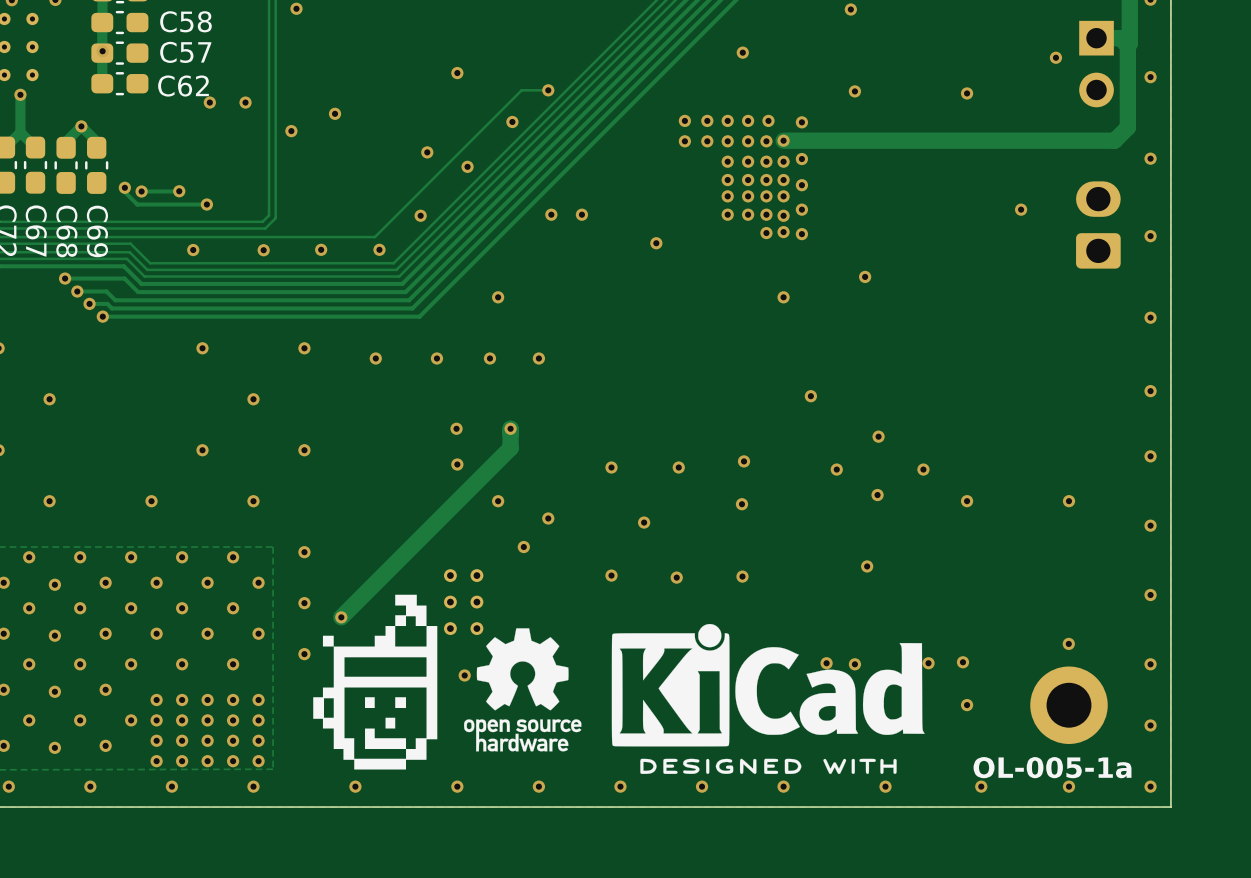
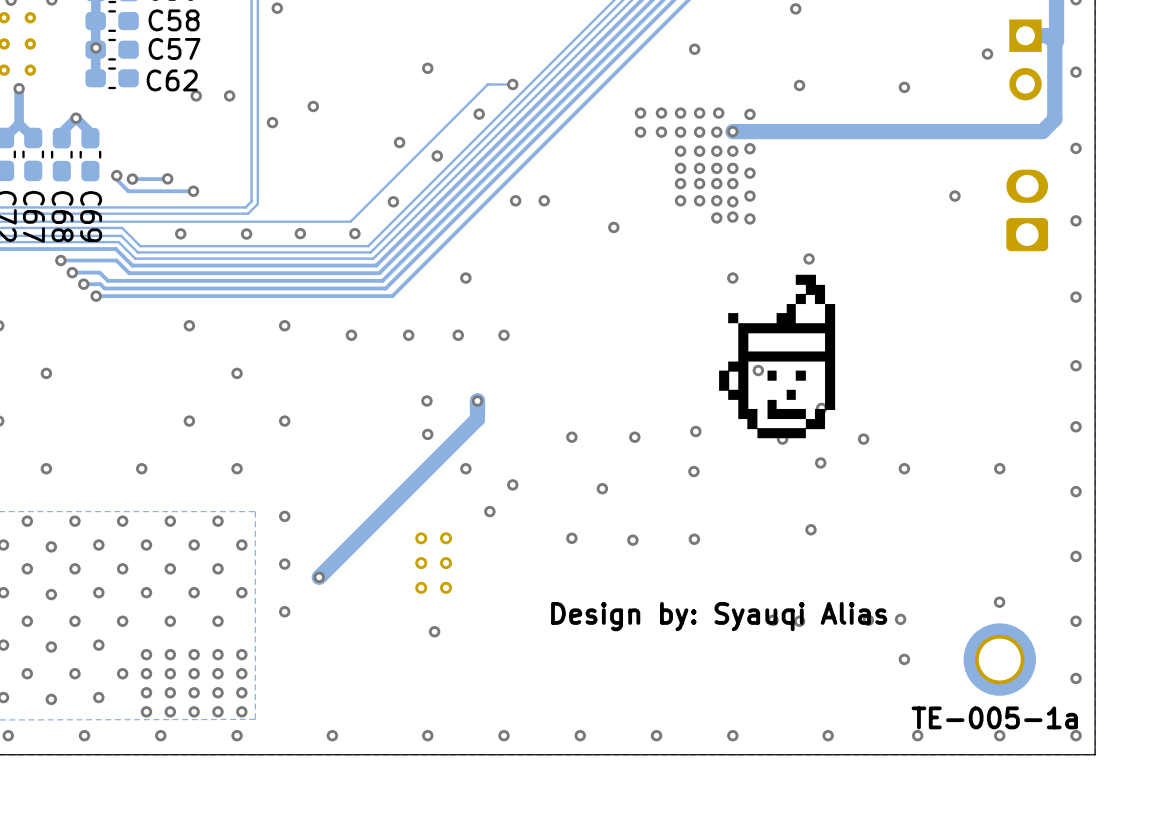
drawing: none -> [719, 274, 836, 439]
drawing: [313, 594, 438, 770] -> none
drawing: [611, 623, 925, 774] -> none
drawing: [464, 628, 582, 752] -> none
text: none -> Design by: Syauqi Alias (719, 616)
text: OL-005-1a (1052, 767) -> TE-005-1a (994, 717)

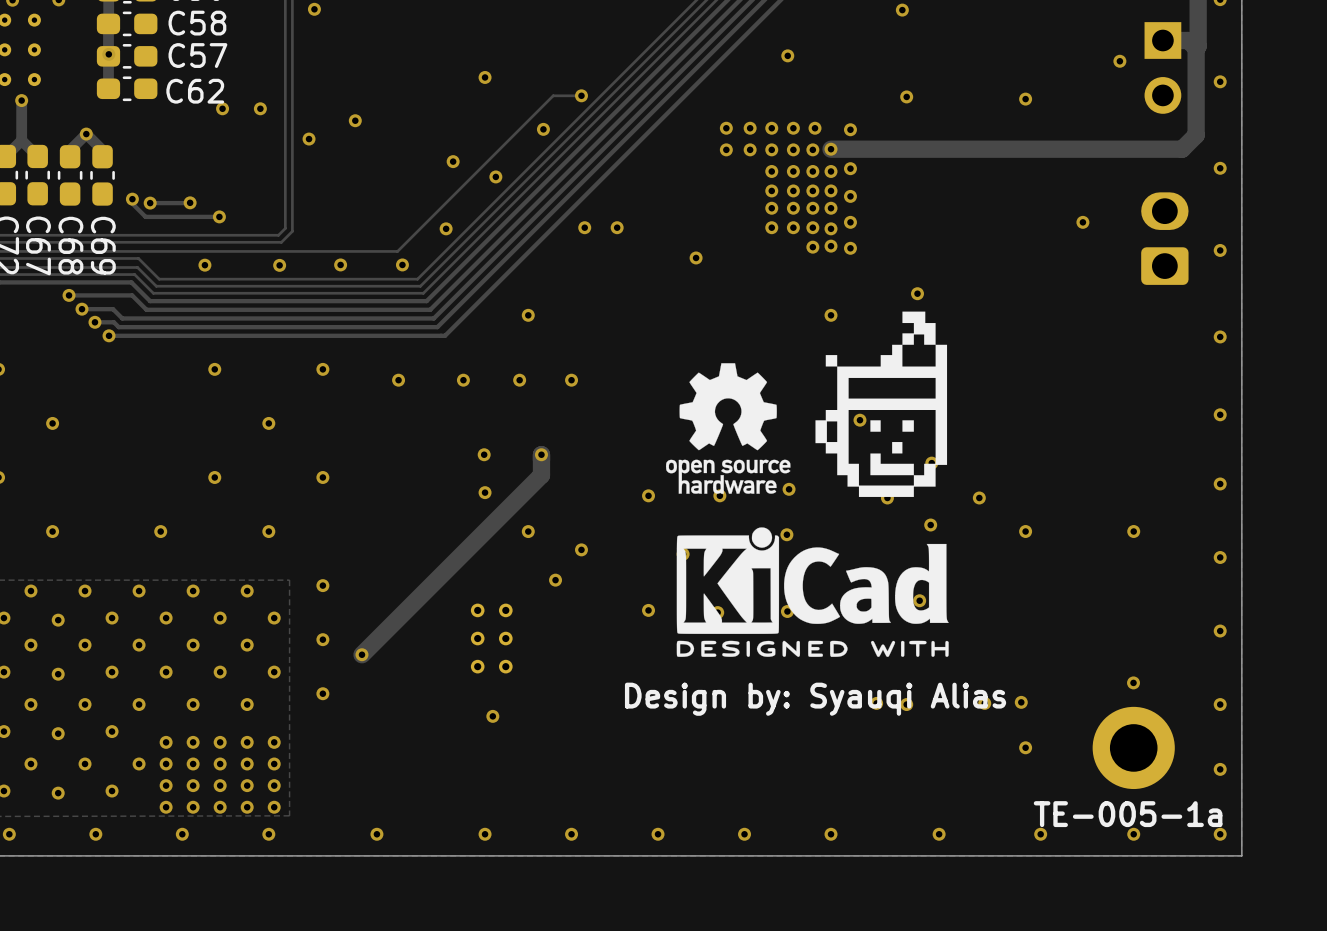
drawing: none -> [665, 363, 791, 494]
drawing: none -> [676, 527, 949, 657]

